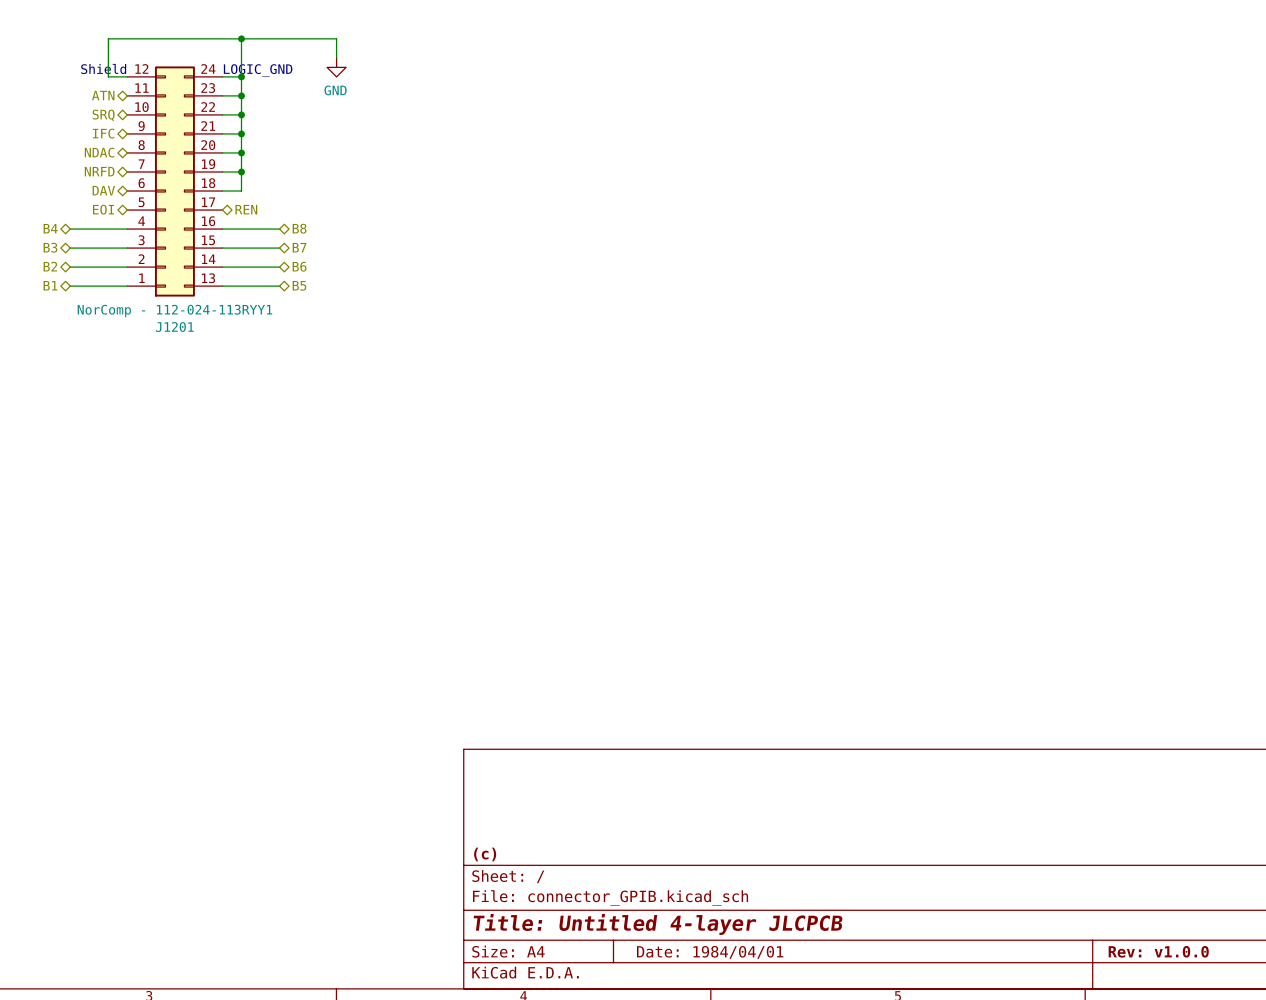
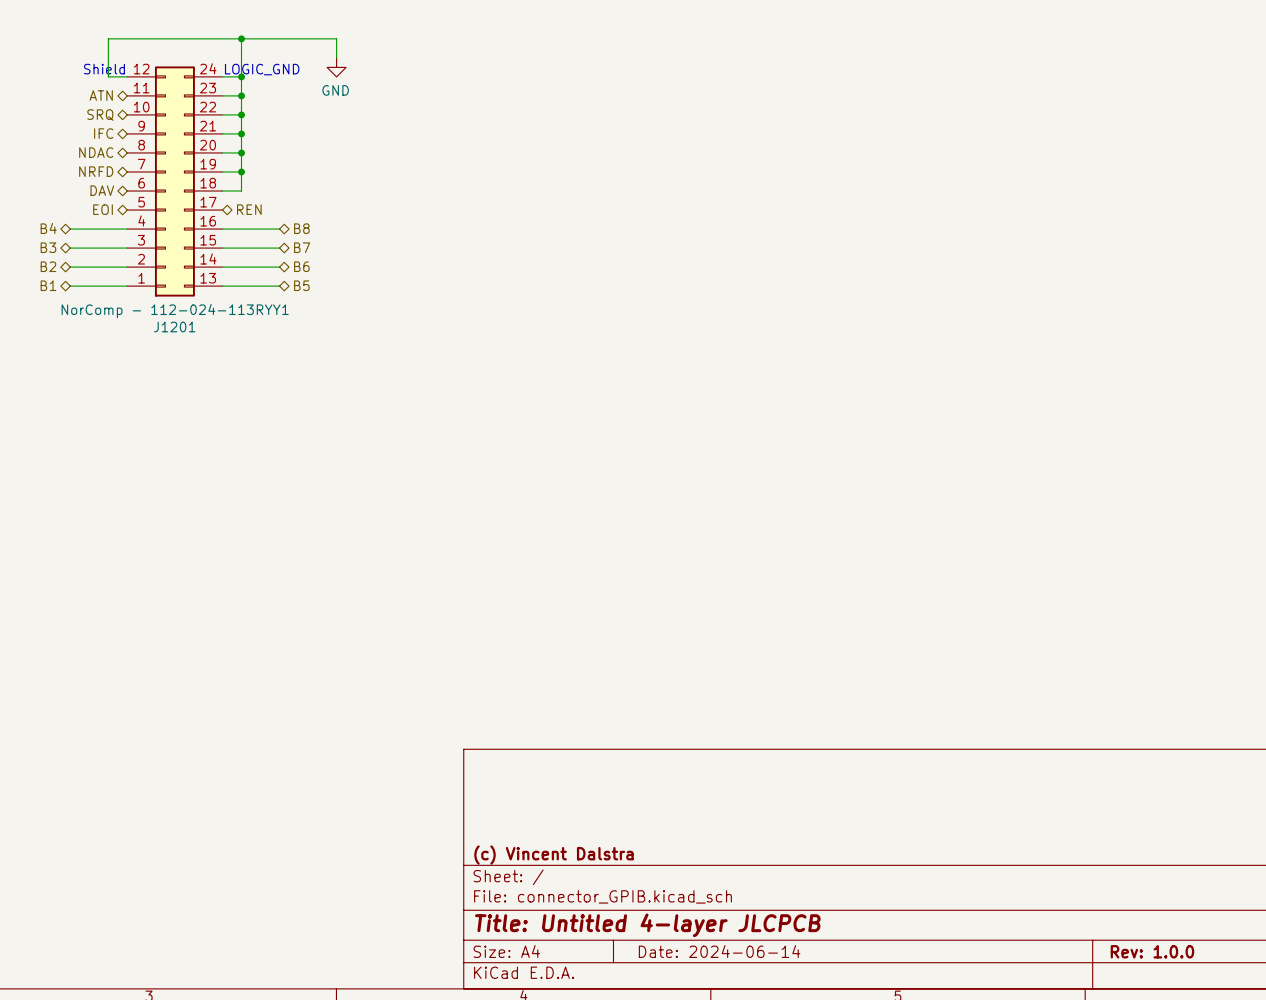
title block: (c) (485, 854) -> (c) Vincent Dalstra (553, 855)
title block: Rev: v1.0.0 (1158, 951) -> Rev: 1.0.0 (1152, 951)
title block: Date: 1984/04/01 (710, 952) -> Date: 2024-06-14 (719, 951)

